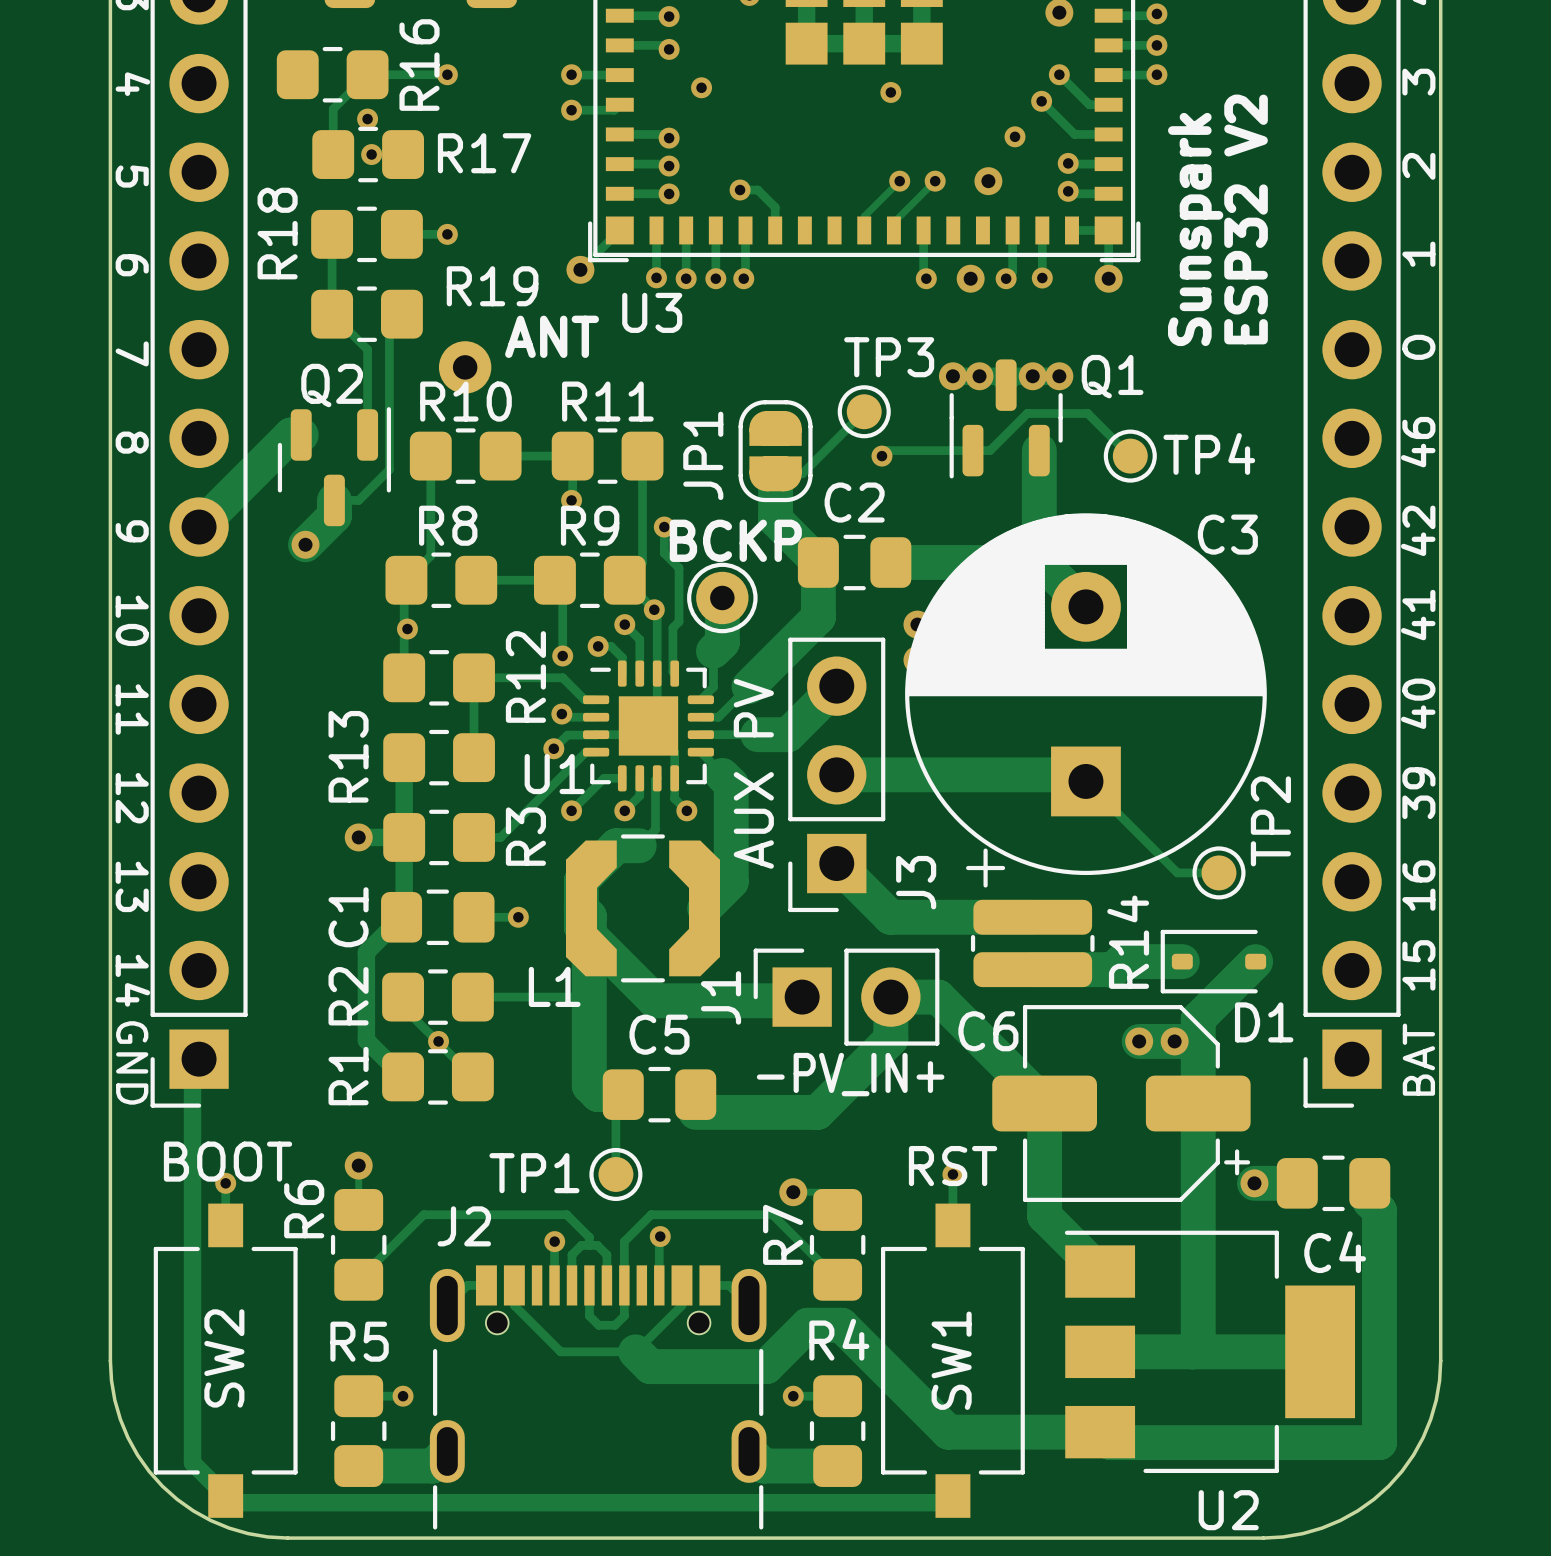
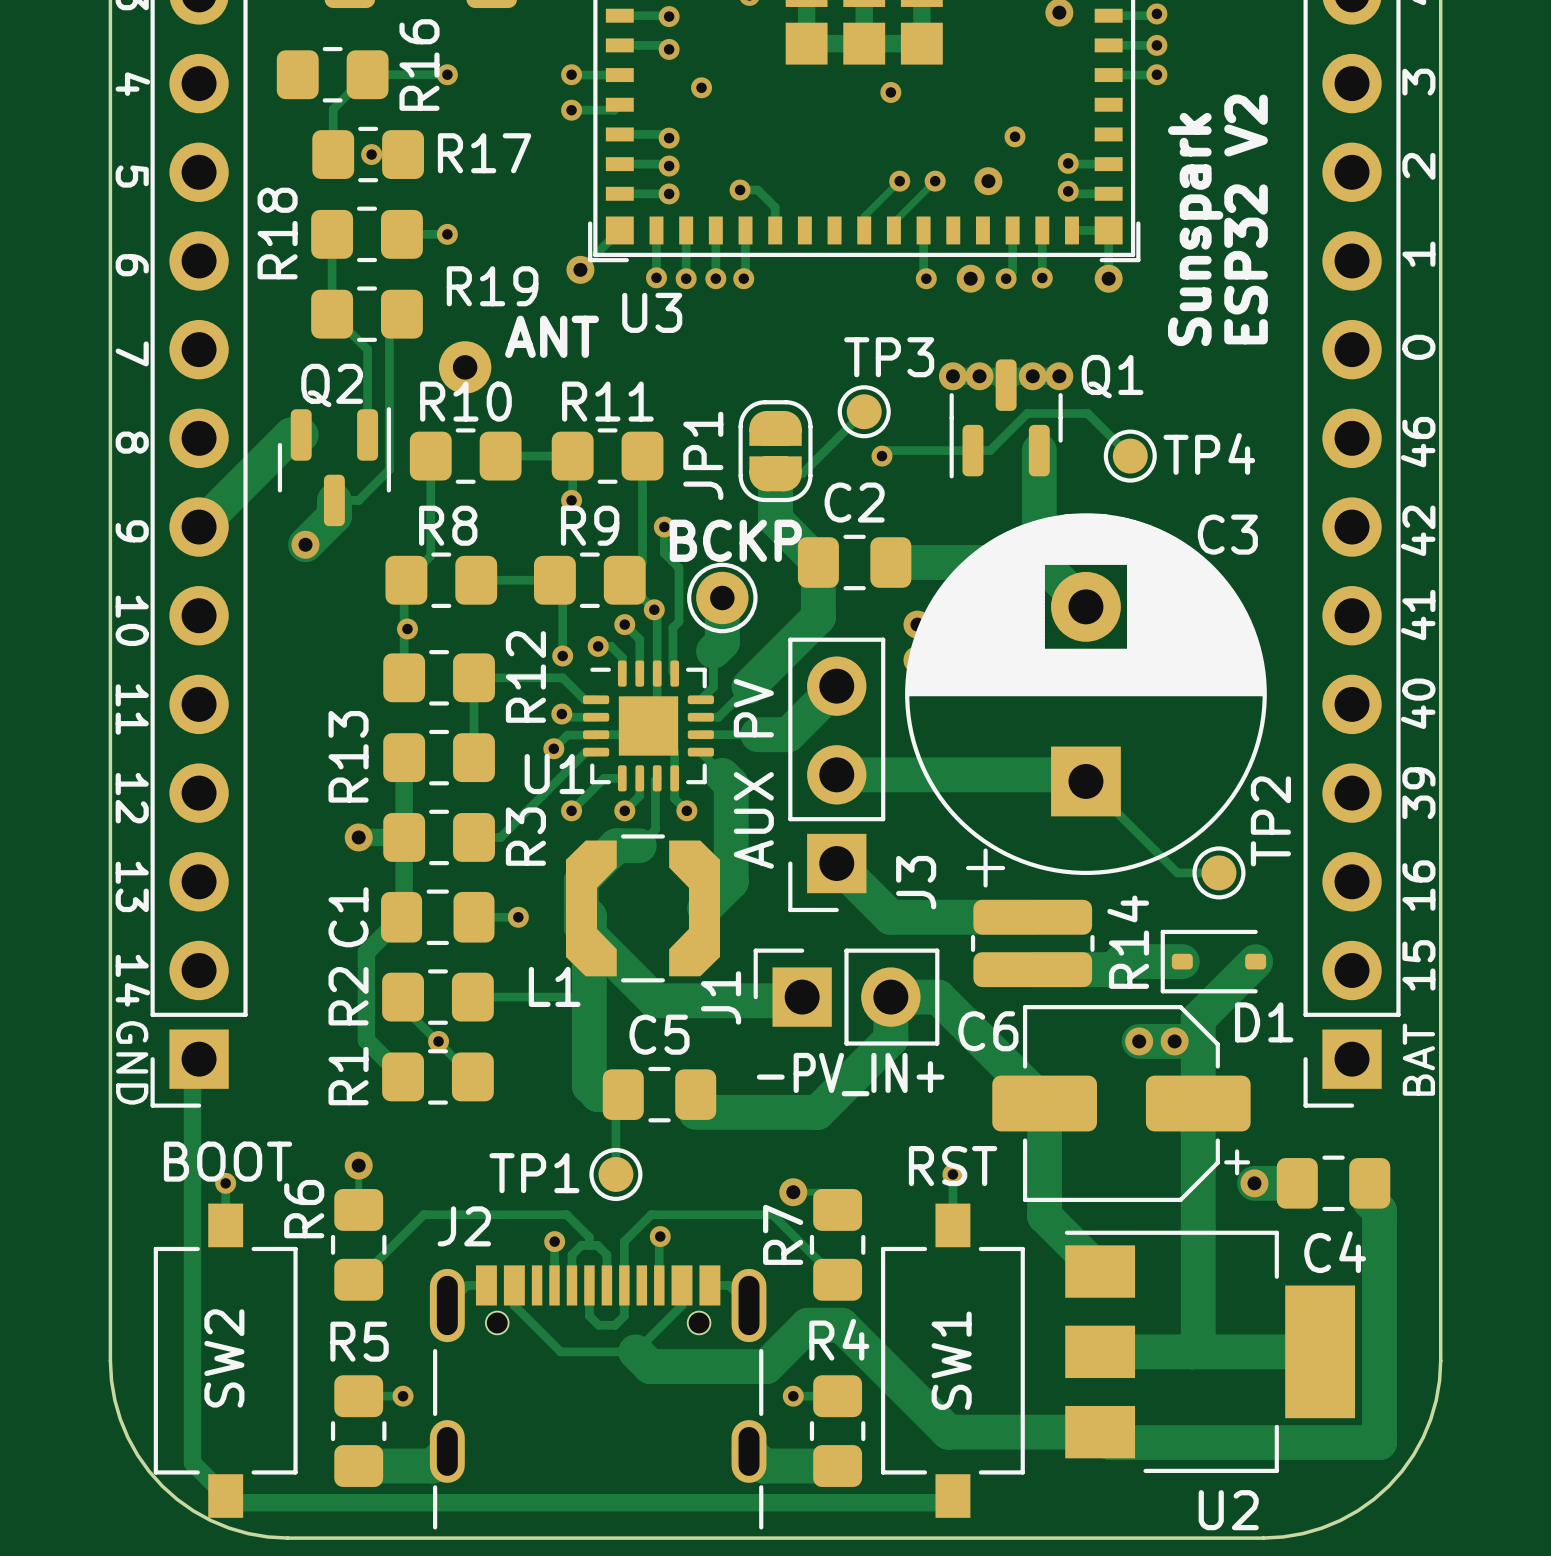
track: (1059, 74) (1089, 104) (1108, 104) -> none
via: (1059, 74) -> none
track: (1041, 101) (1074, 134) (1108, 134) -> none
via: (1041, 101) -> none
via: (367, 119) -> none

